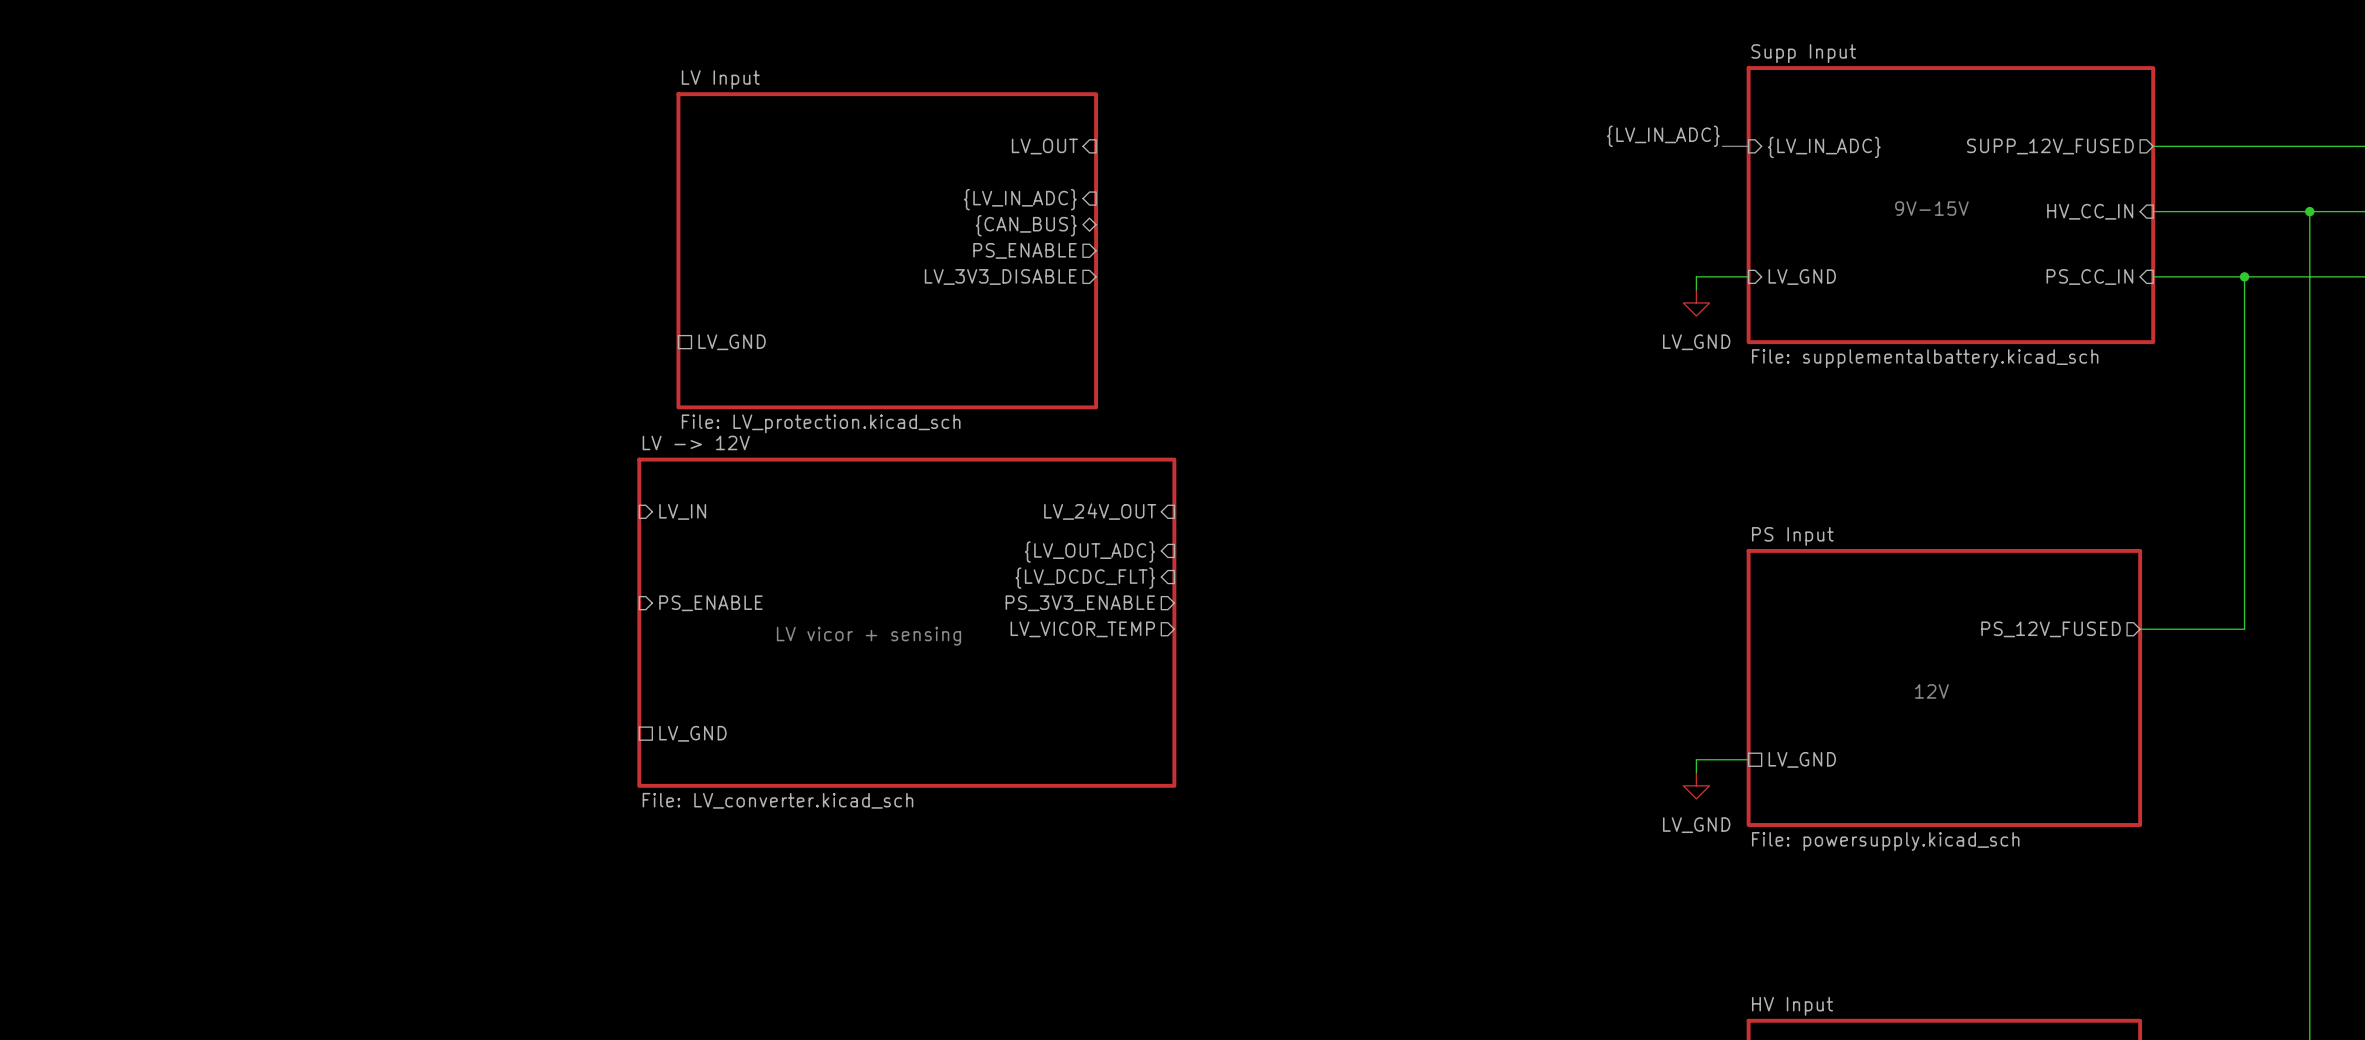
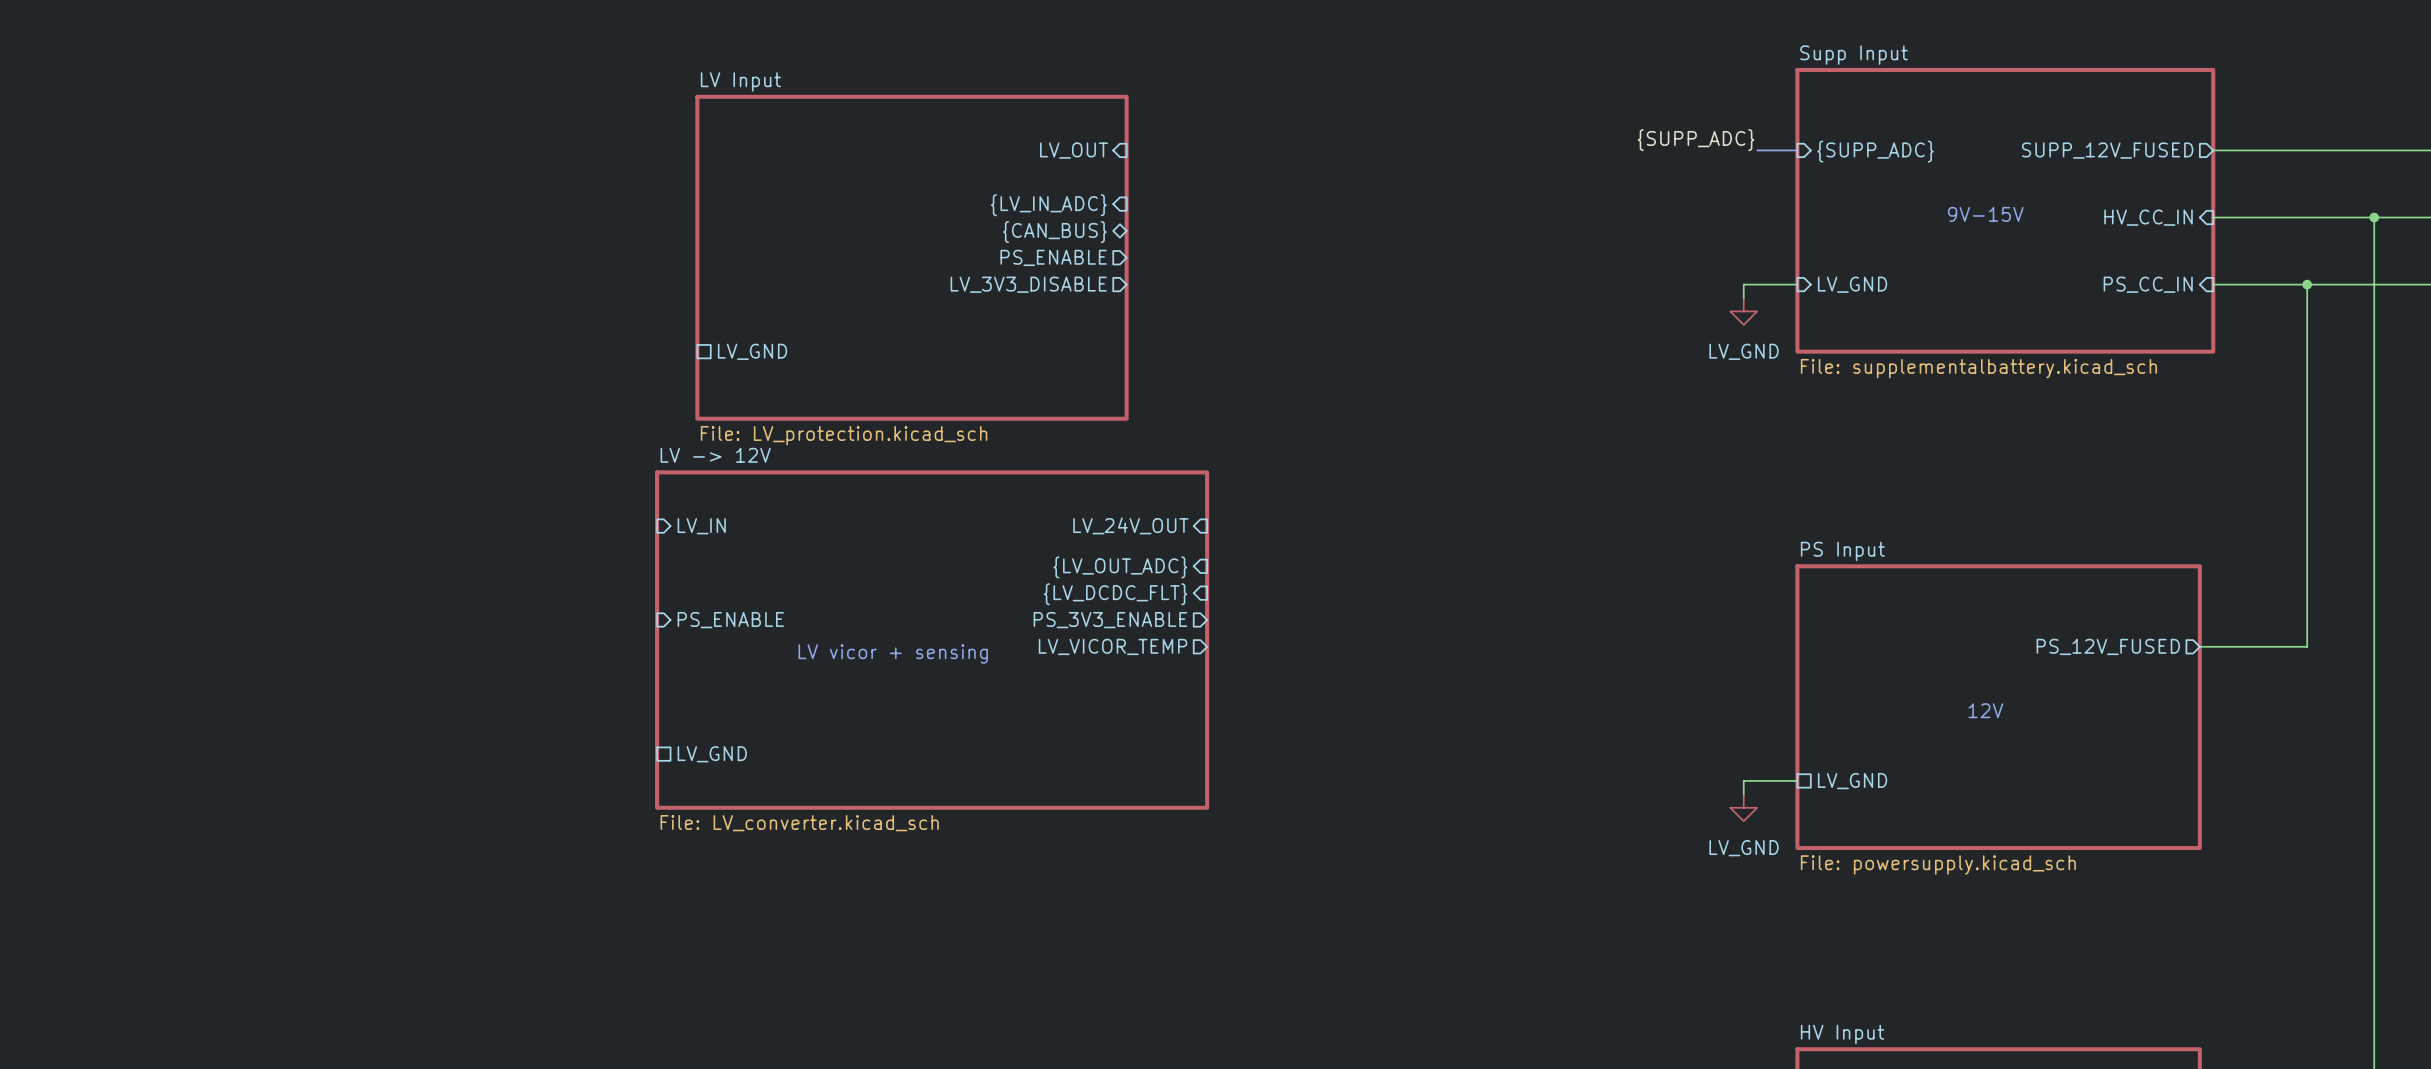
label: none -> {SUPP_ADC} (1696, 140)
label: {LV_IN_ADC} (1663, 136) -> none
bus: none -> (1757, 150) (1770, 150)
sheet pin: {LV_IN_ADC} (1824, 147) -> {SUPP_ADC} (1875, 151)

